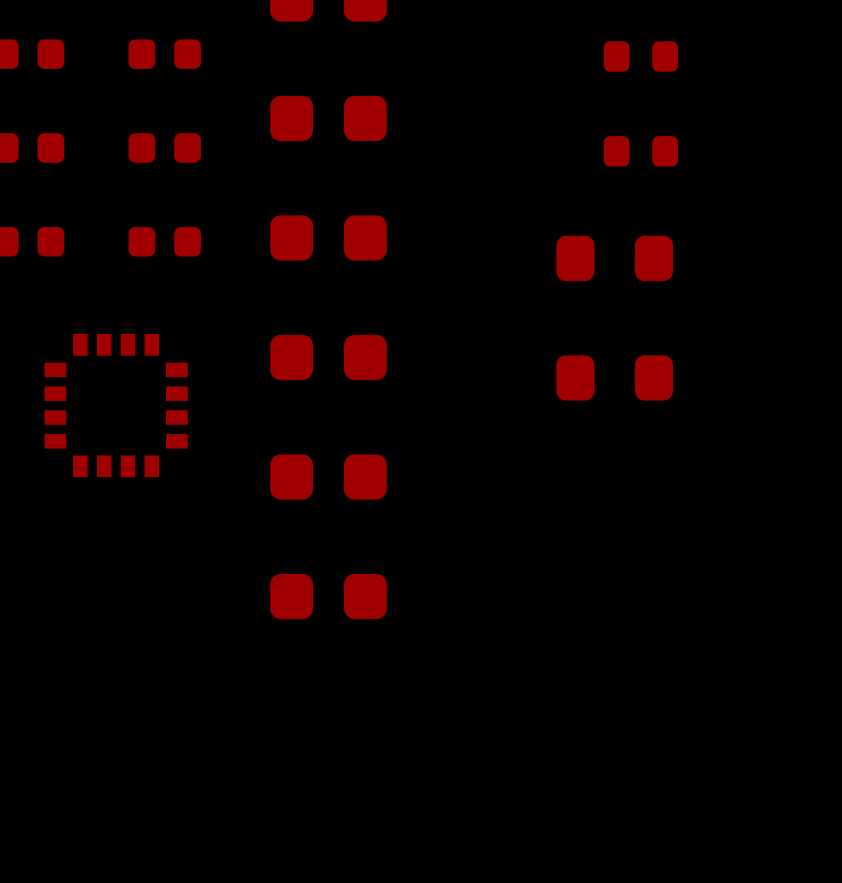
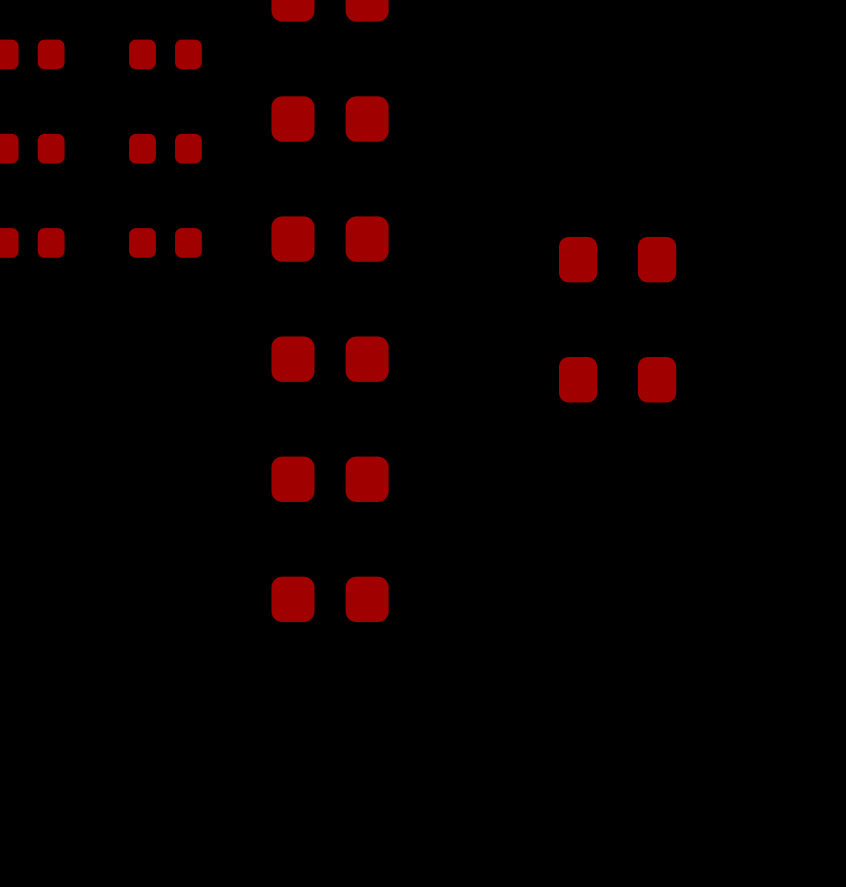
part: (640, 56) -> none
part: (640, 151) -> none
part: (116, 405) -> none

